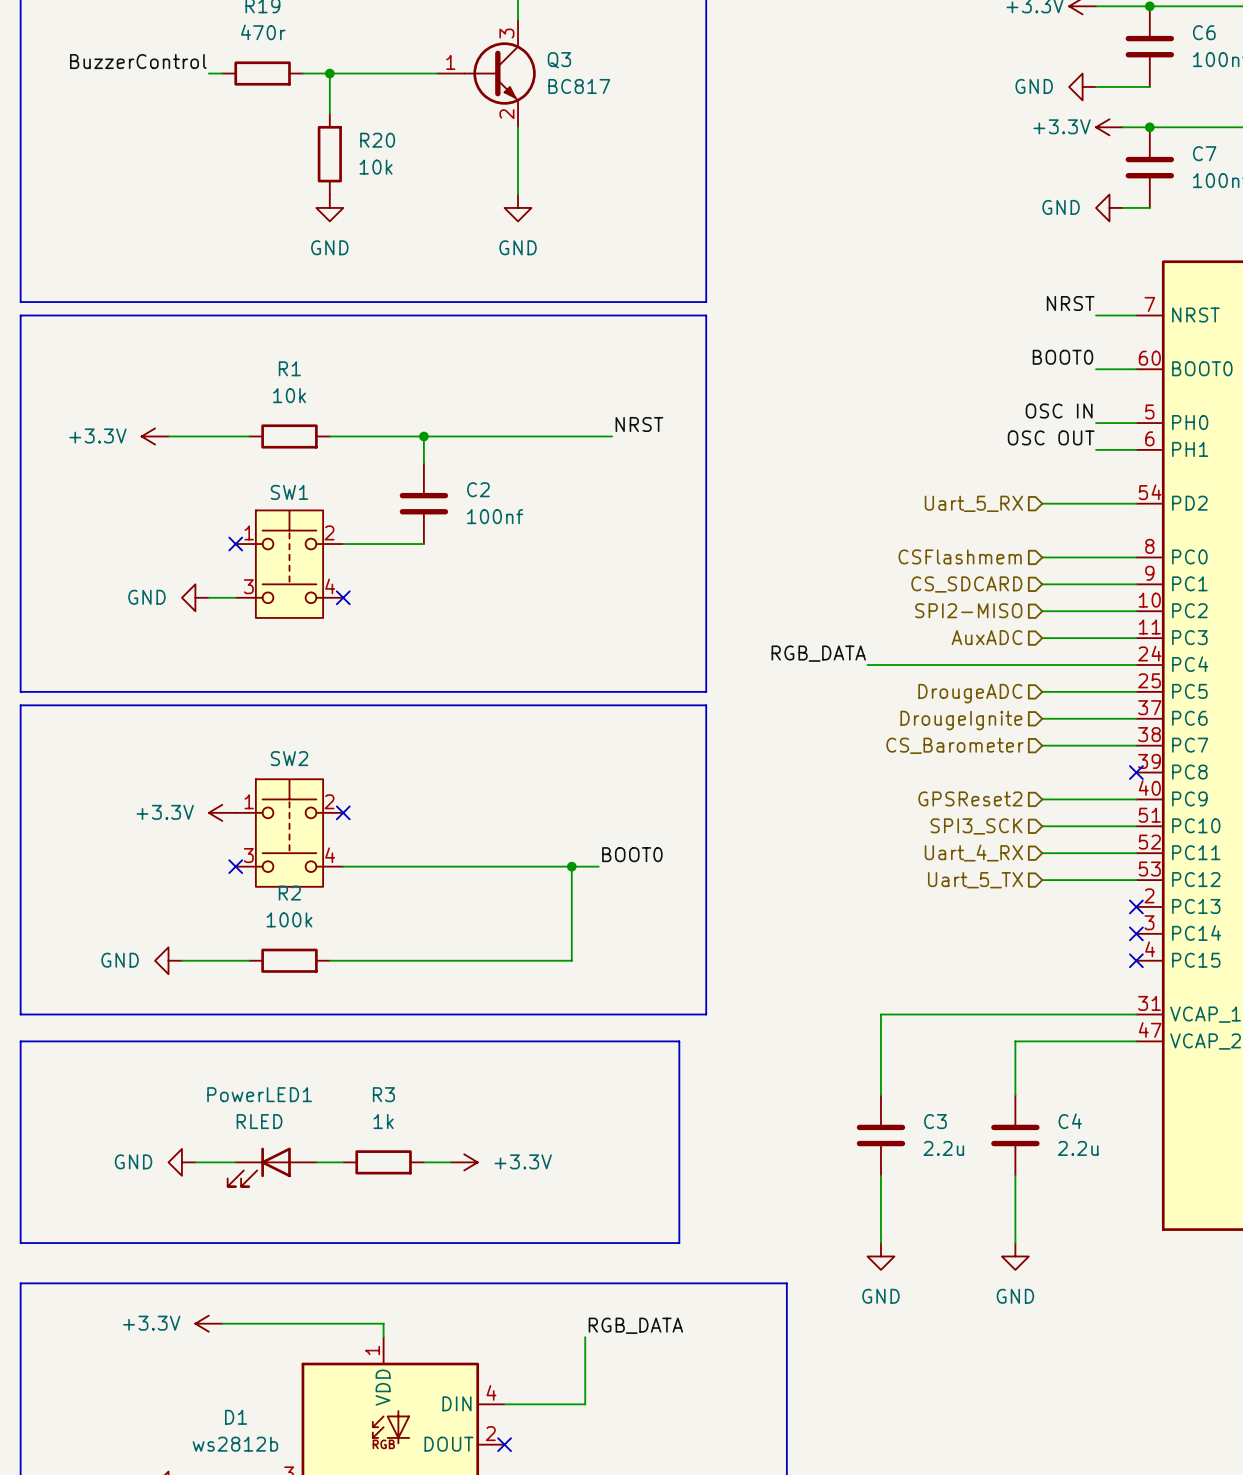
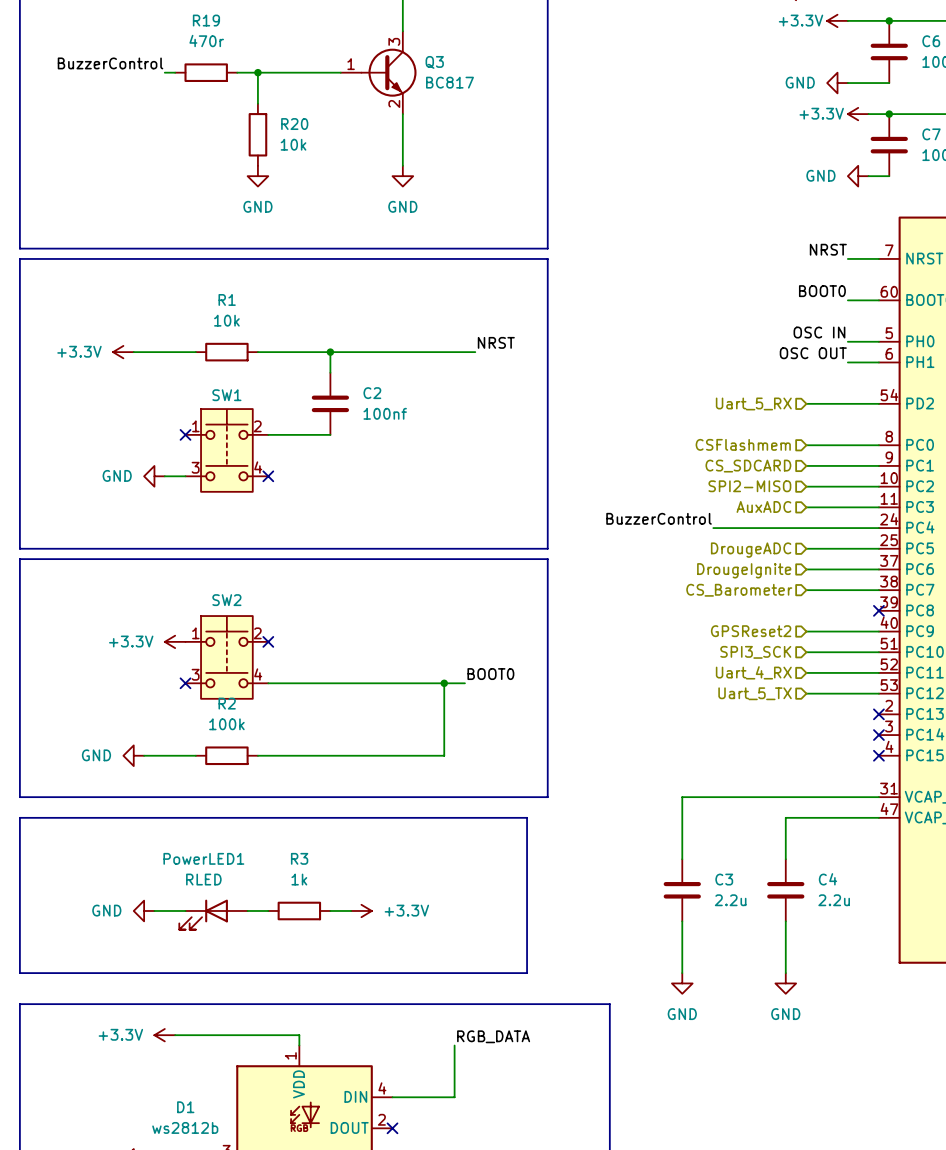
label: RGB_DATA (818, 653) -> none
label: none -> BuzzerControl (659, 518)
wire: (867, 665) (921, 665) -> none

